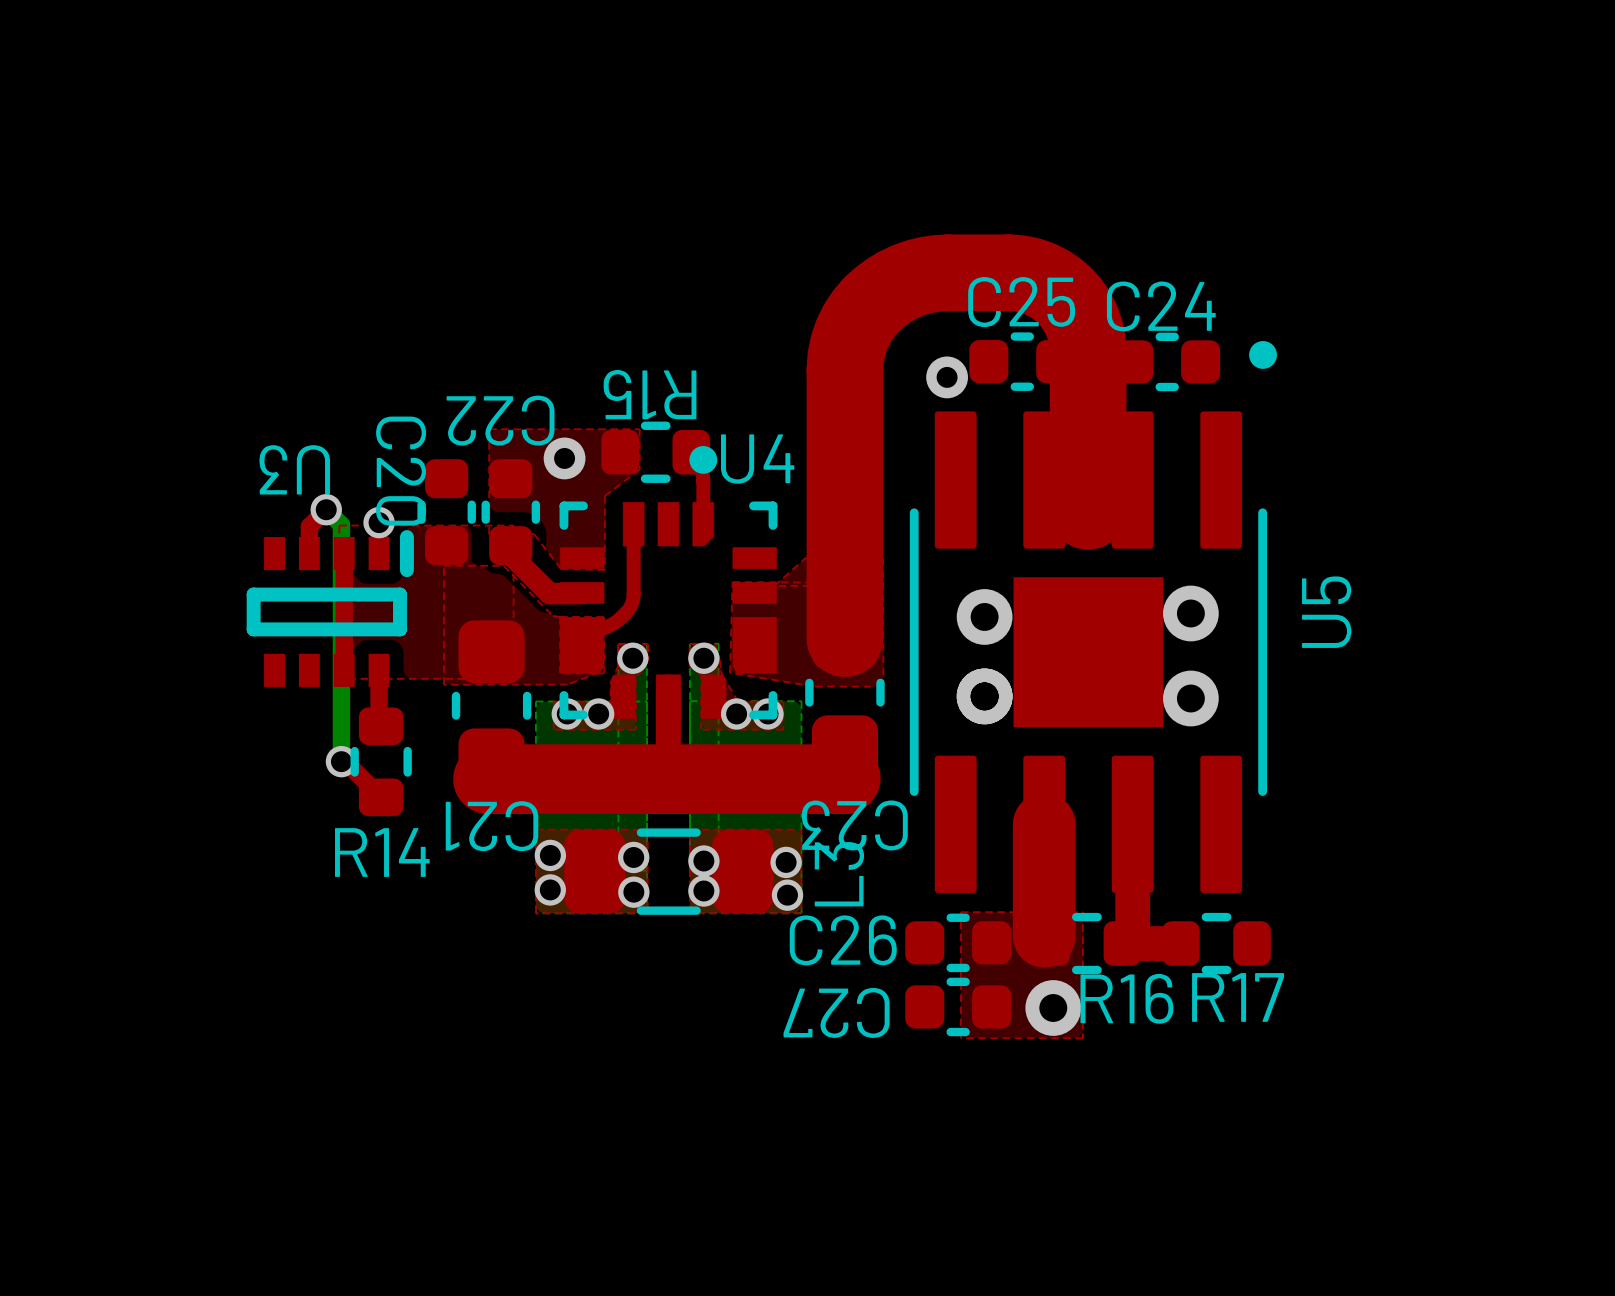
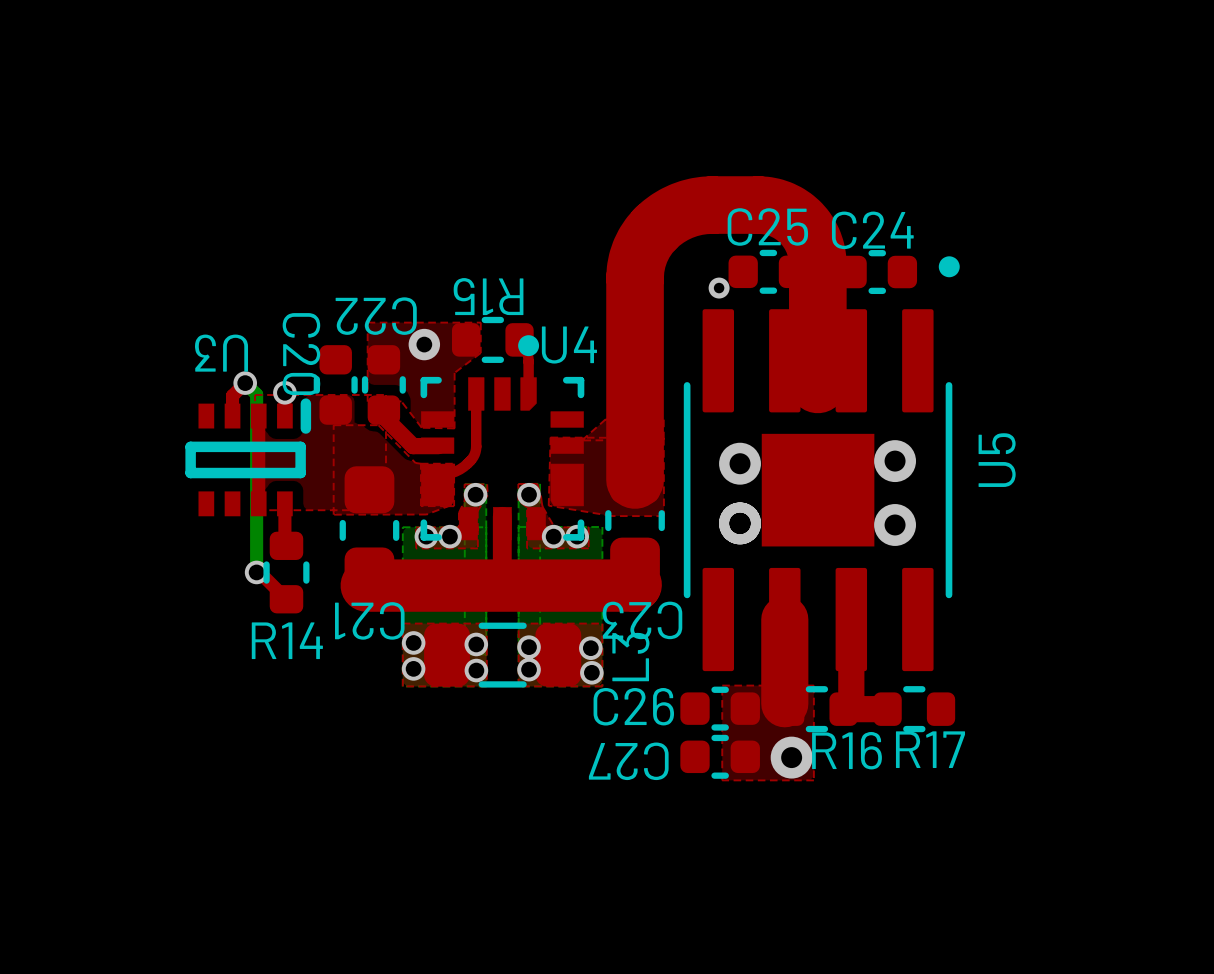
via size: [926, 356, 968, 399] -> [708, 277, 730, 299]

